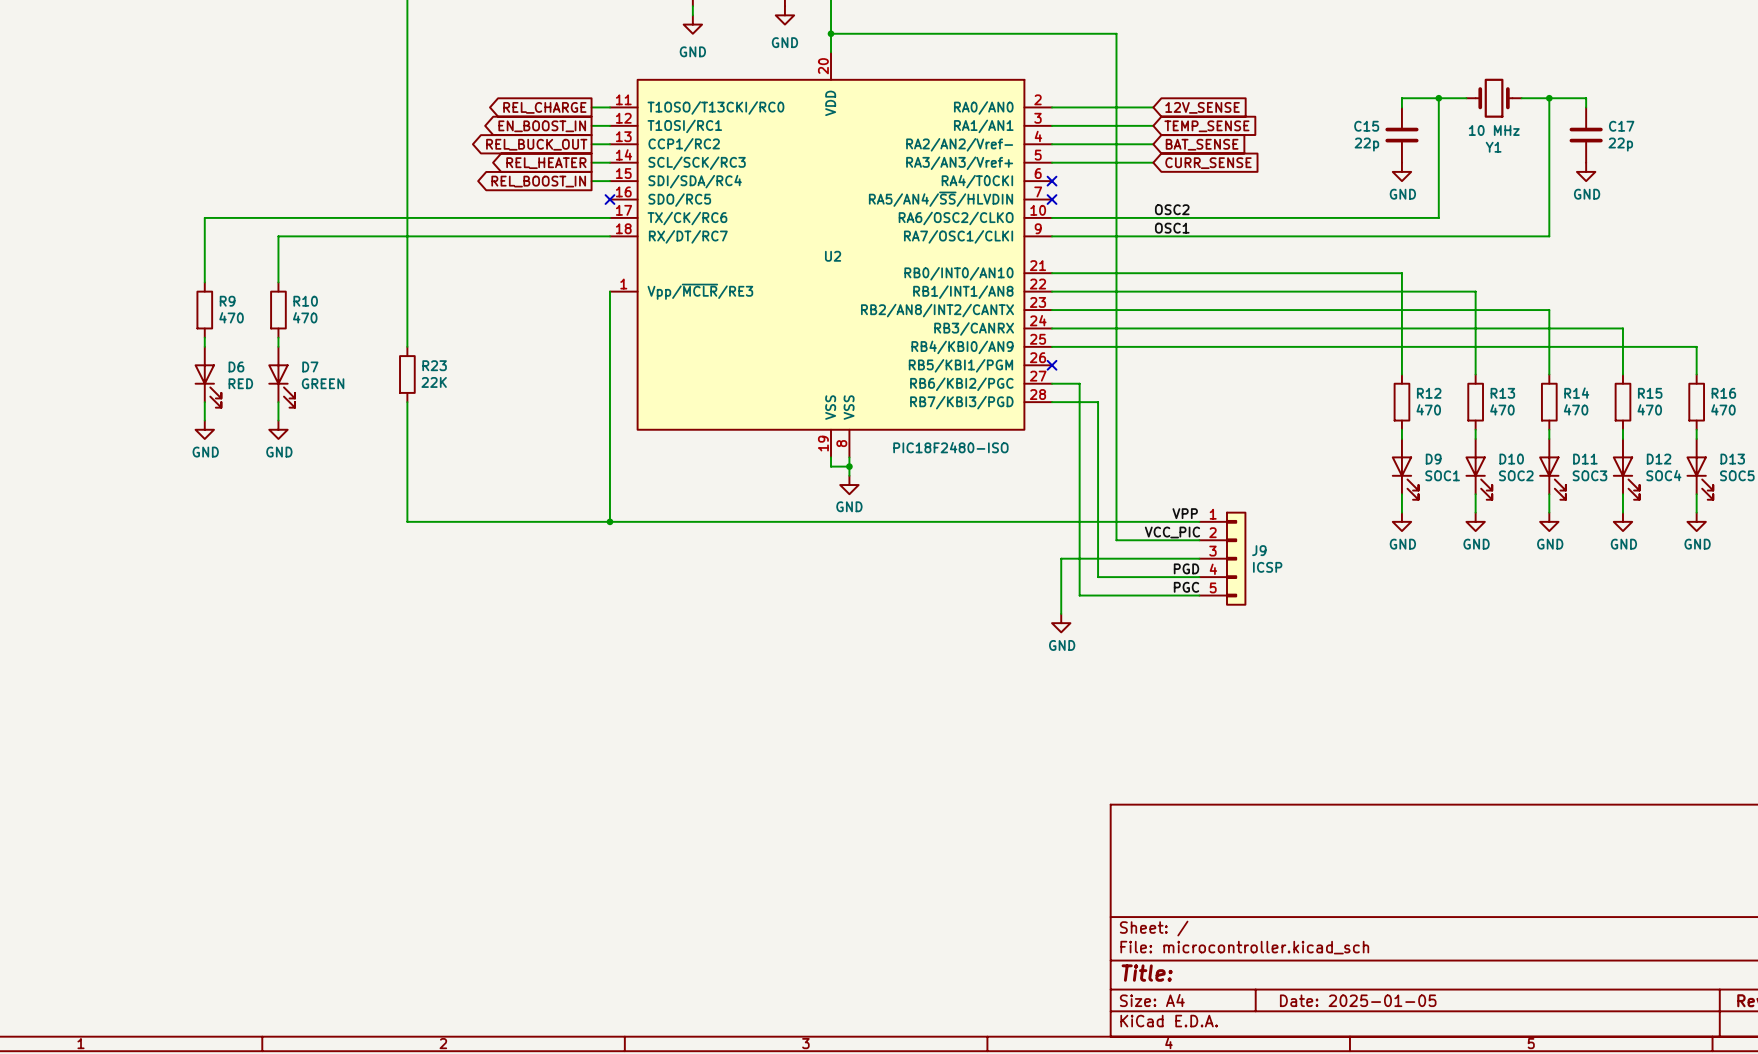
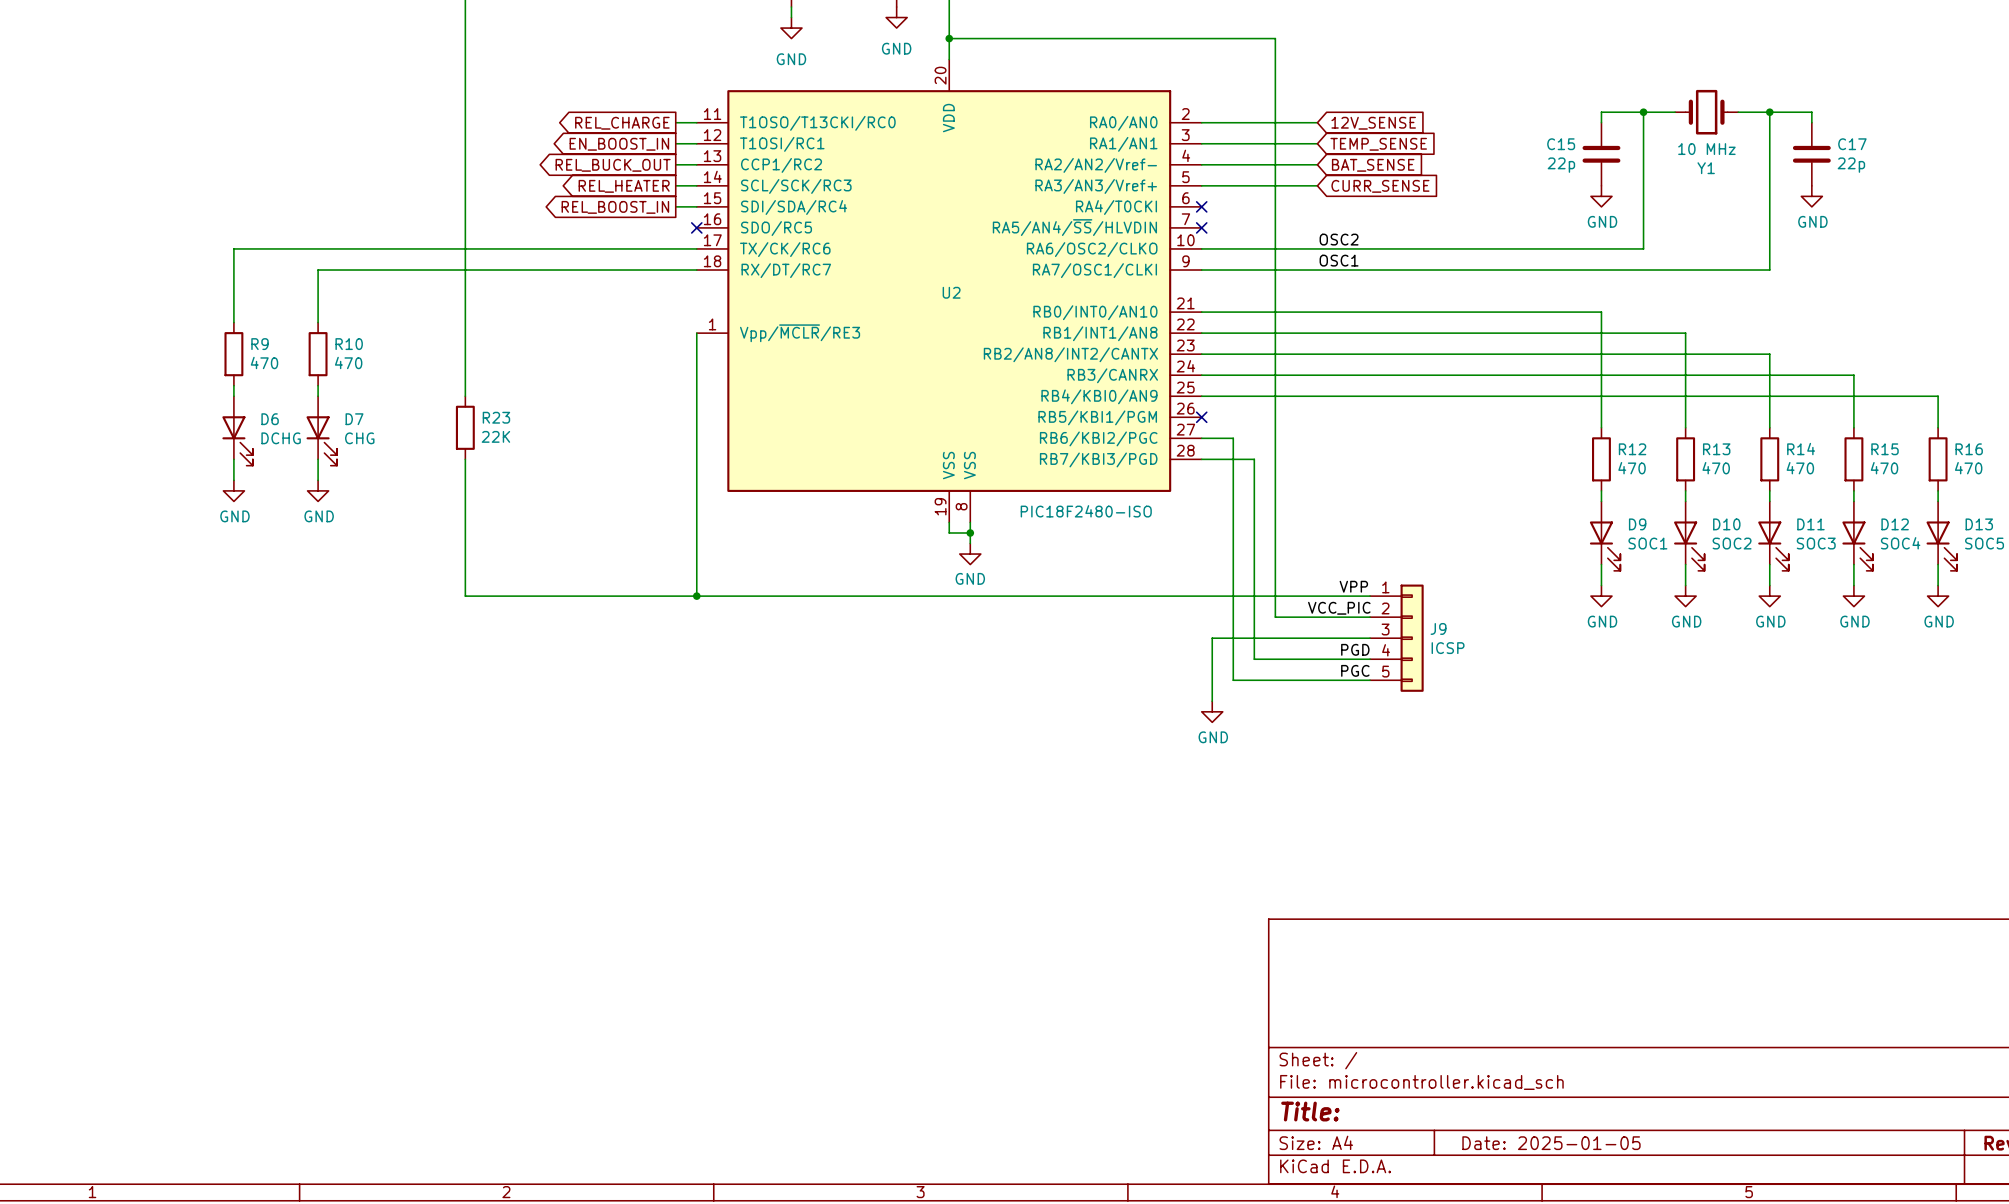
D6 value: RED (240, 383) -> DCHG (281, 438)
D7 value: GREEN (323, 383) -> CHG (359, 438)

